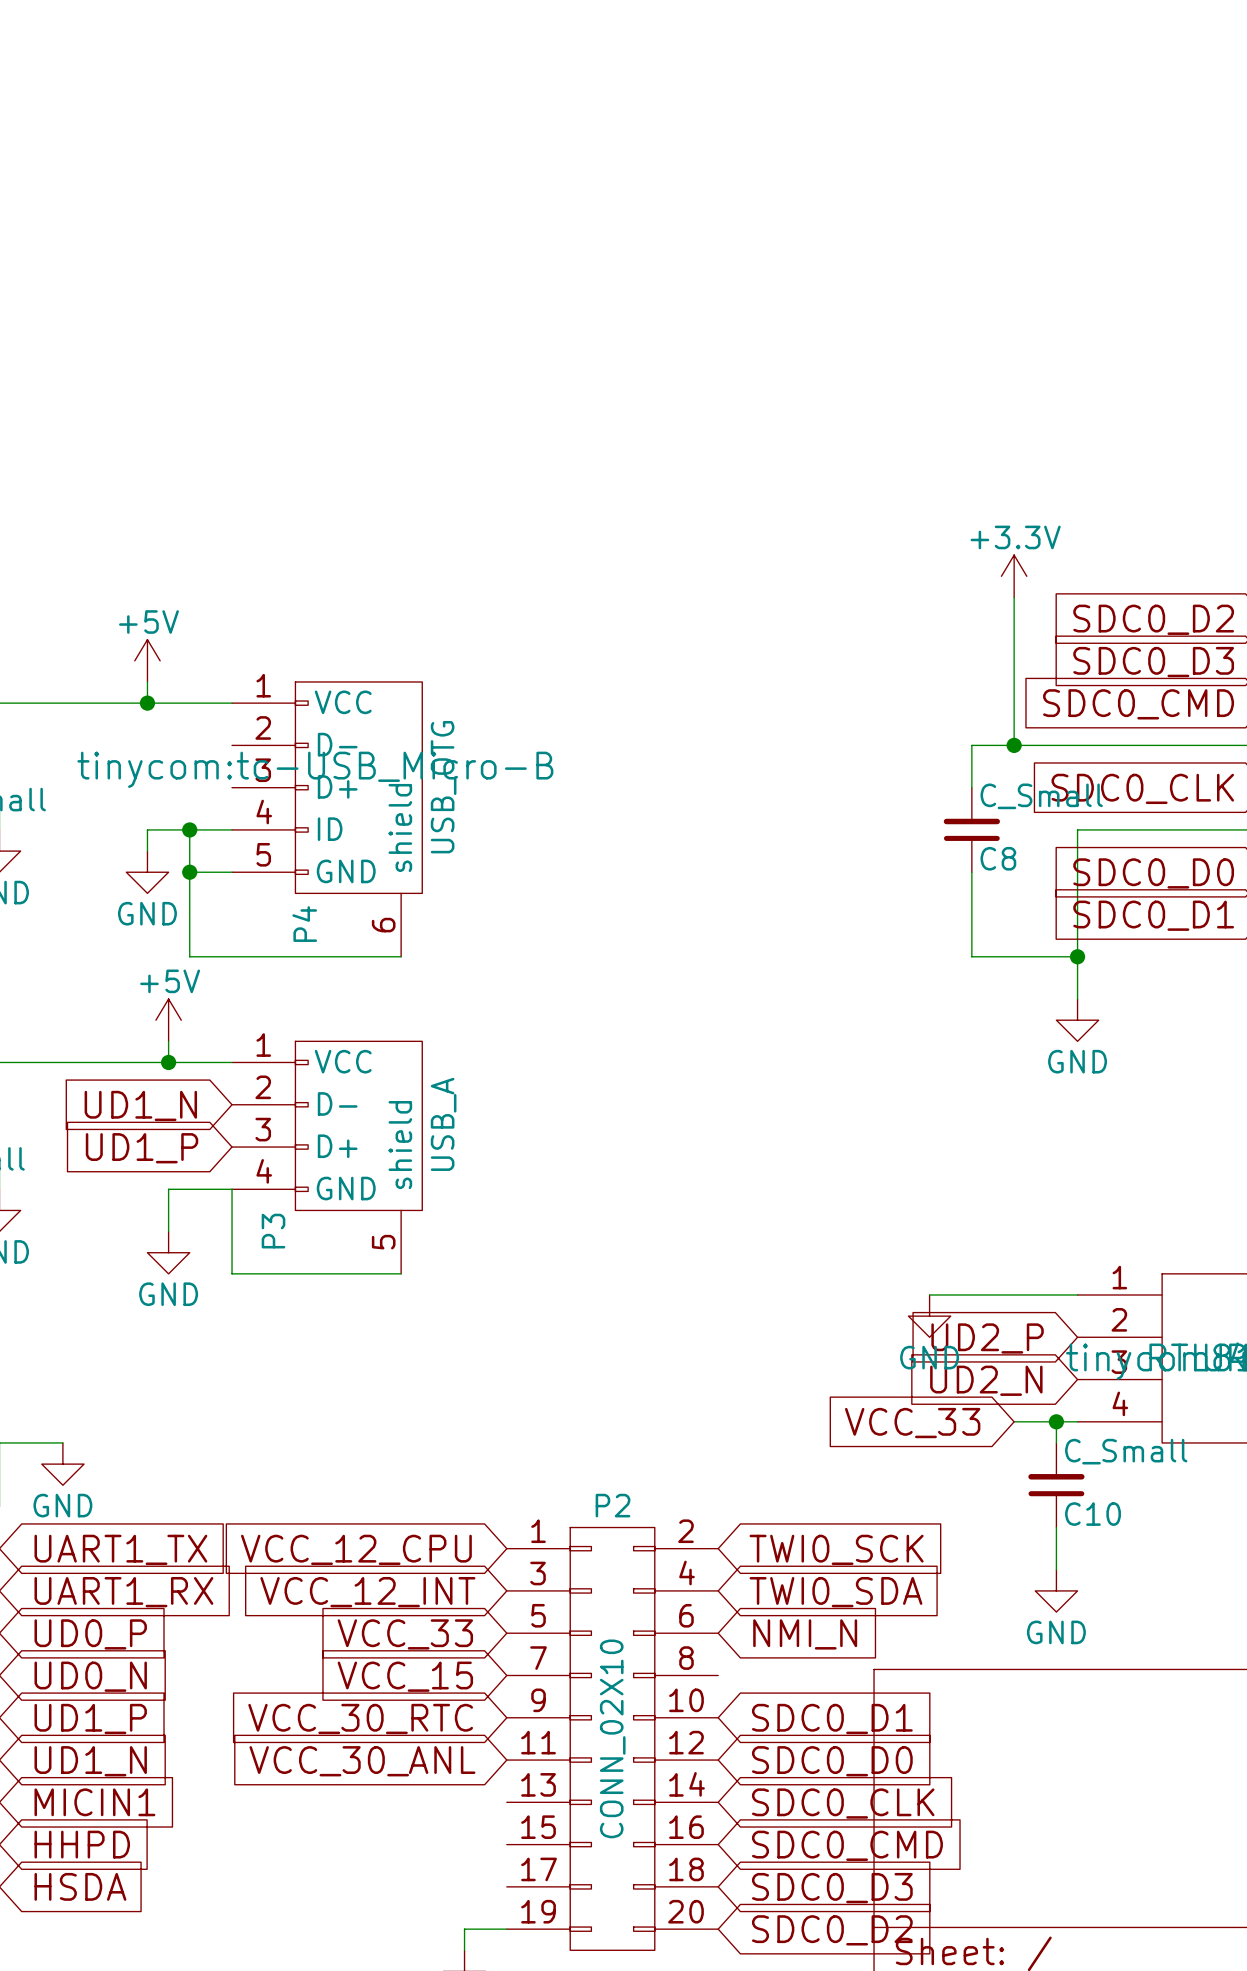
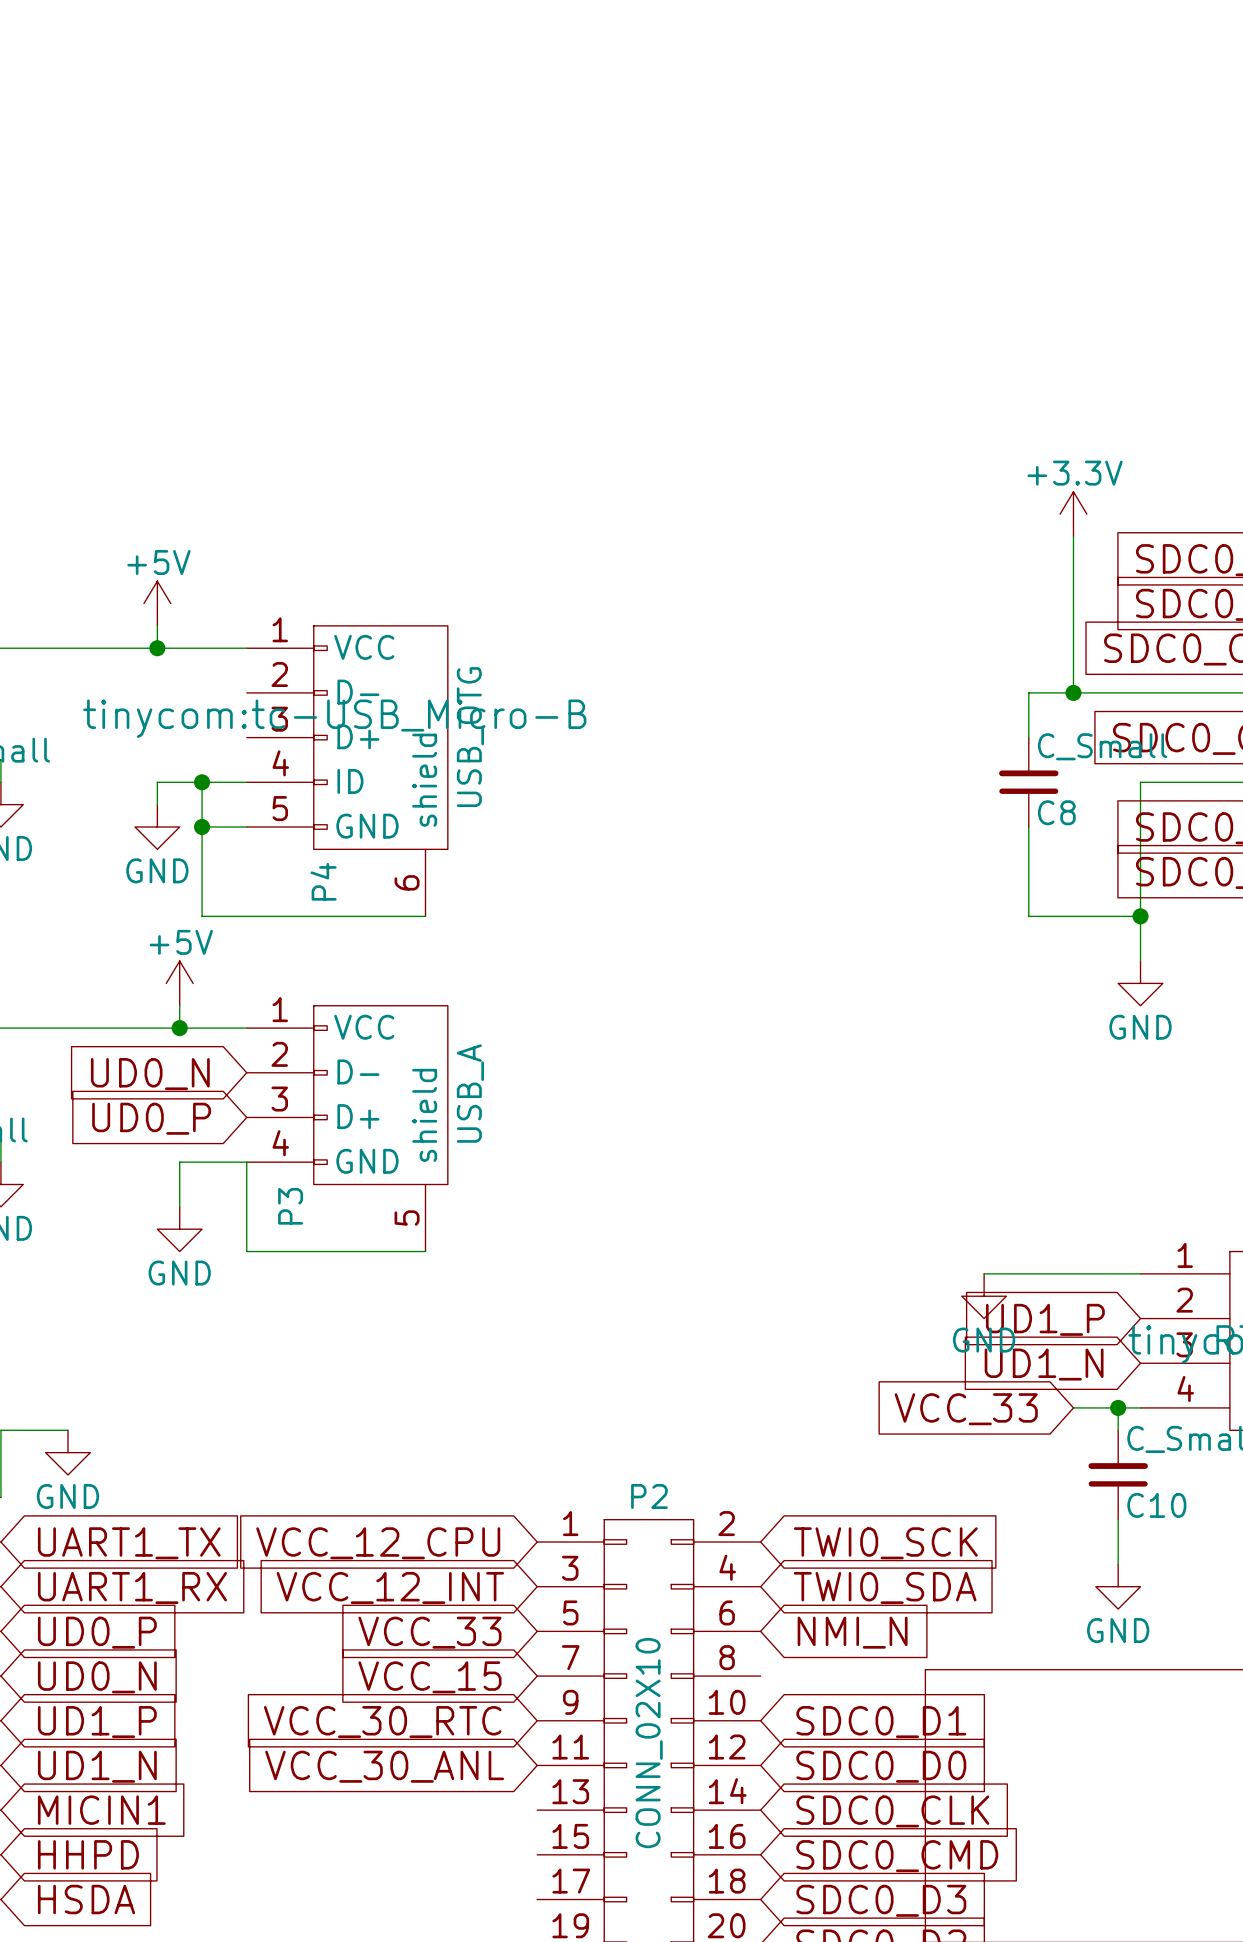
global label: UD1_N (140, 1105) -> UD0_N (150, 1074)
global label: UD1_P (142, 1148) -> UD0_P (151, 1118)
global label: UD2_P (987, 1338) -> UD1_P (1045, 1319)
global label: UD2_N (986, 1380) -> UD1_N (1044, 1364)

